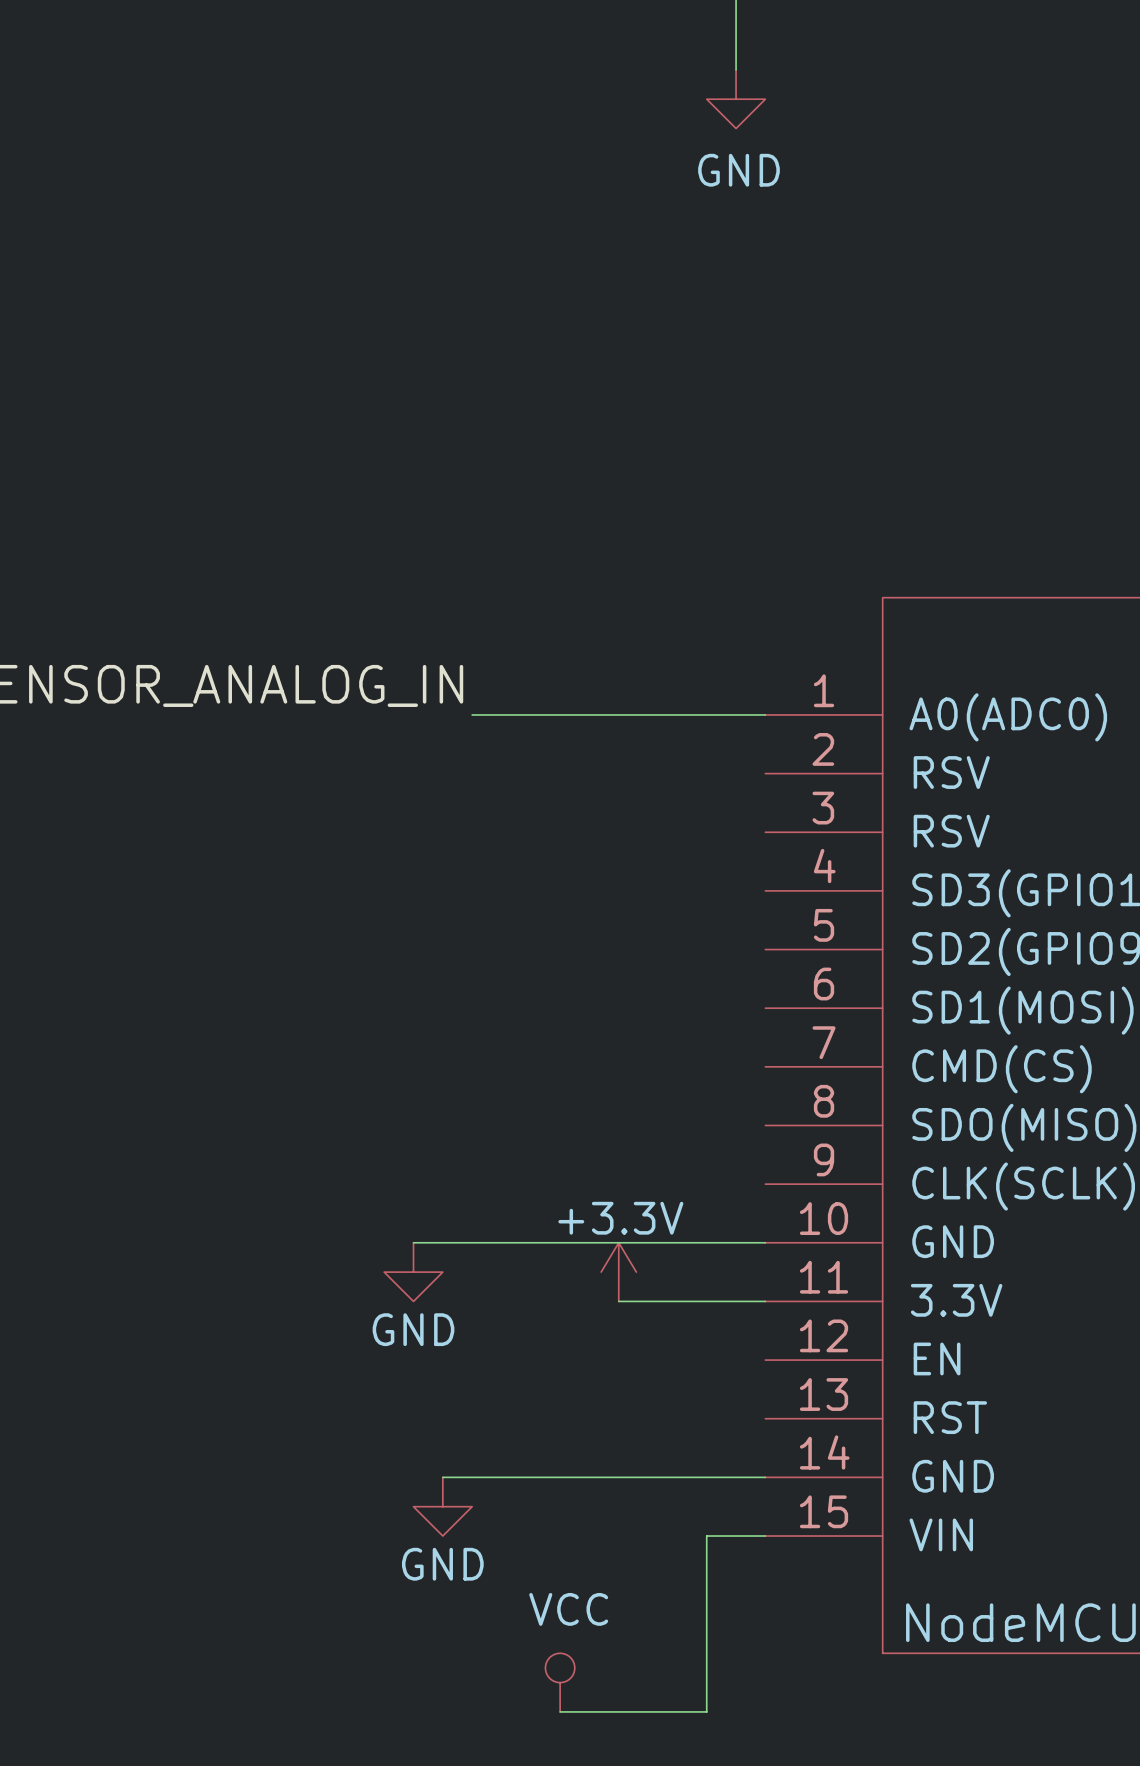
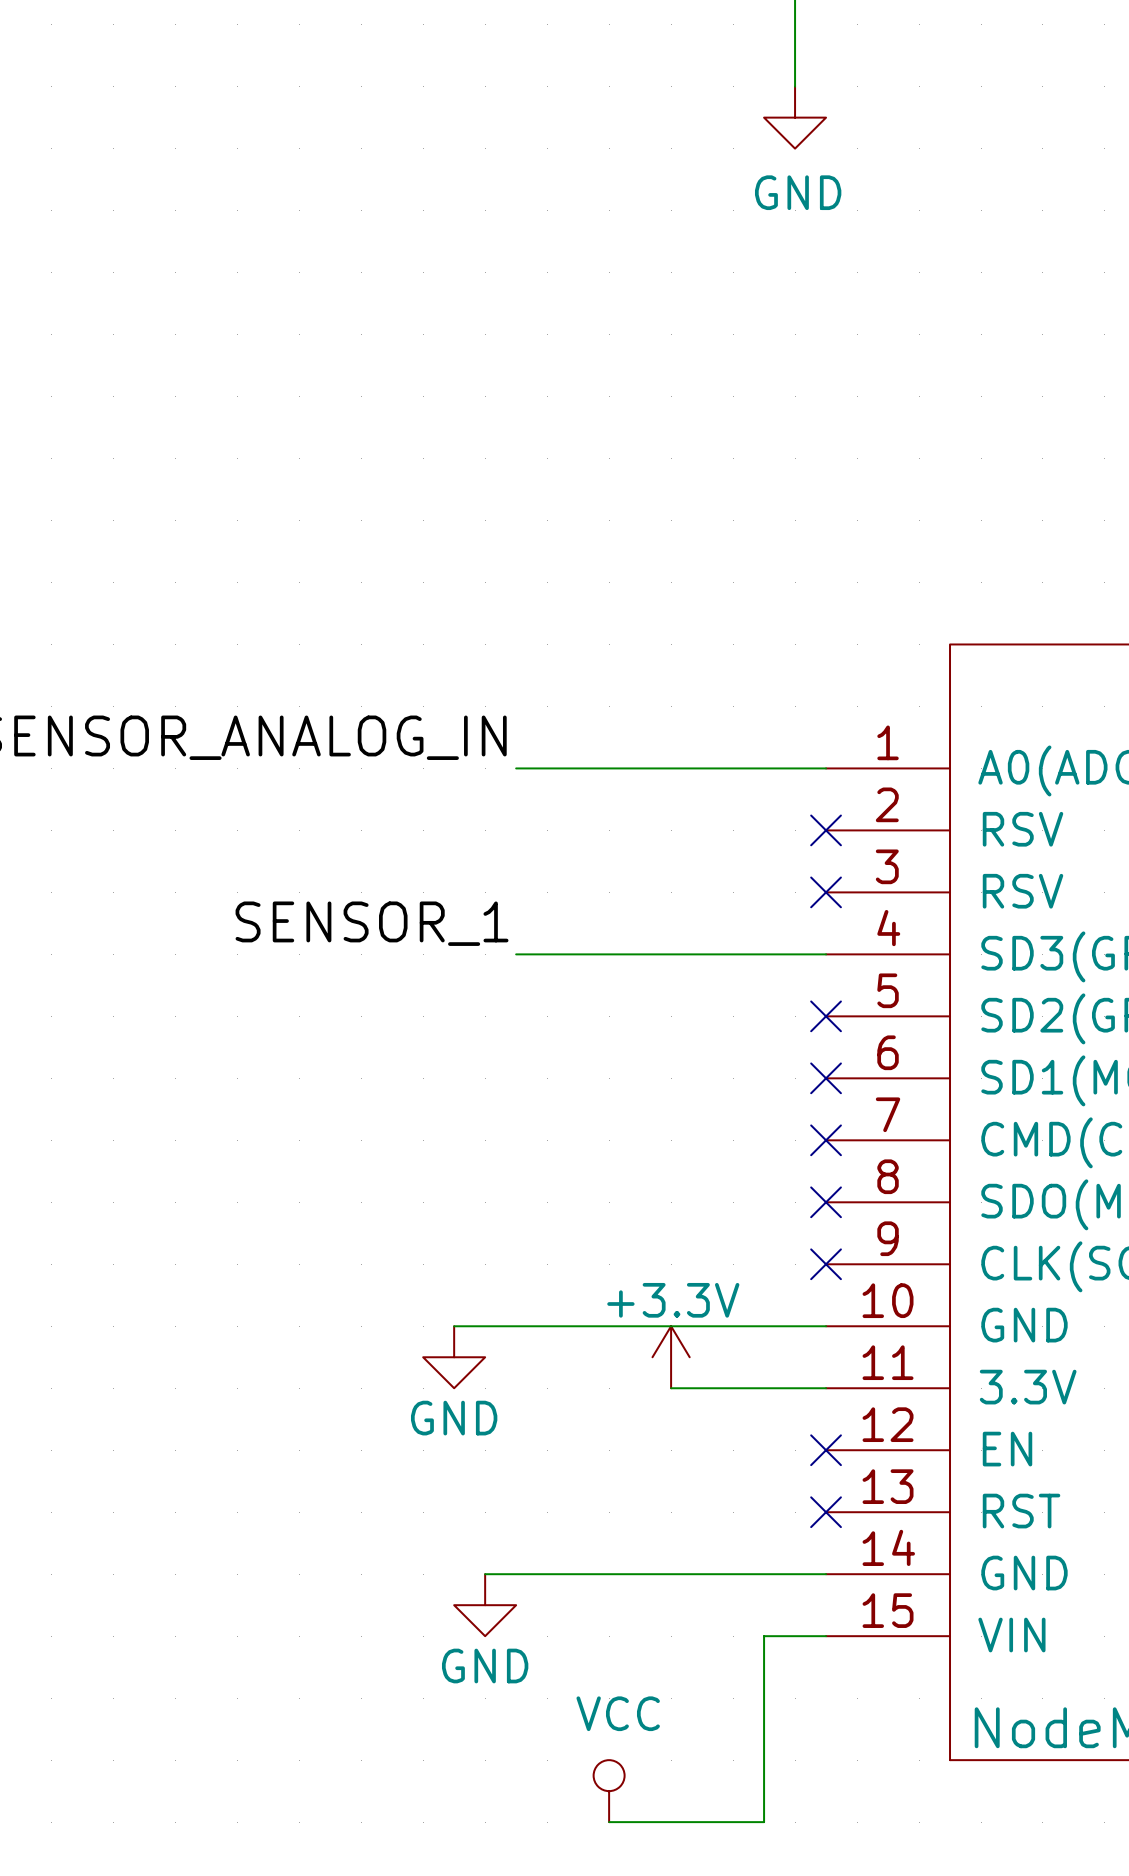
no-connect mark: none -> (826, 830)
no-connect mark: none -> (826, 892)
label: none -> SENSOR_1 (372, 923)
wire: none -> (516, 954) (826, 954)
no-connect mark: none -> (826, 1016)
no-connect mark: none -> (826, 1078)
no-connect mark: none -> (826, 1140)
no-connect mark: none -> (826, 1202)
no-connect mark: none -> (826, 1264)
no-connect mark: none -> (826, 1450)
no-connect mark: none -> (826, 1512)

